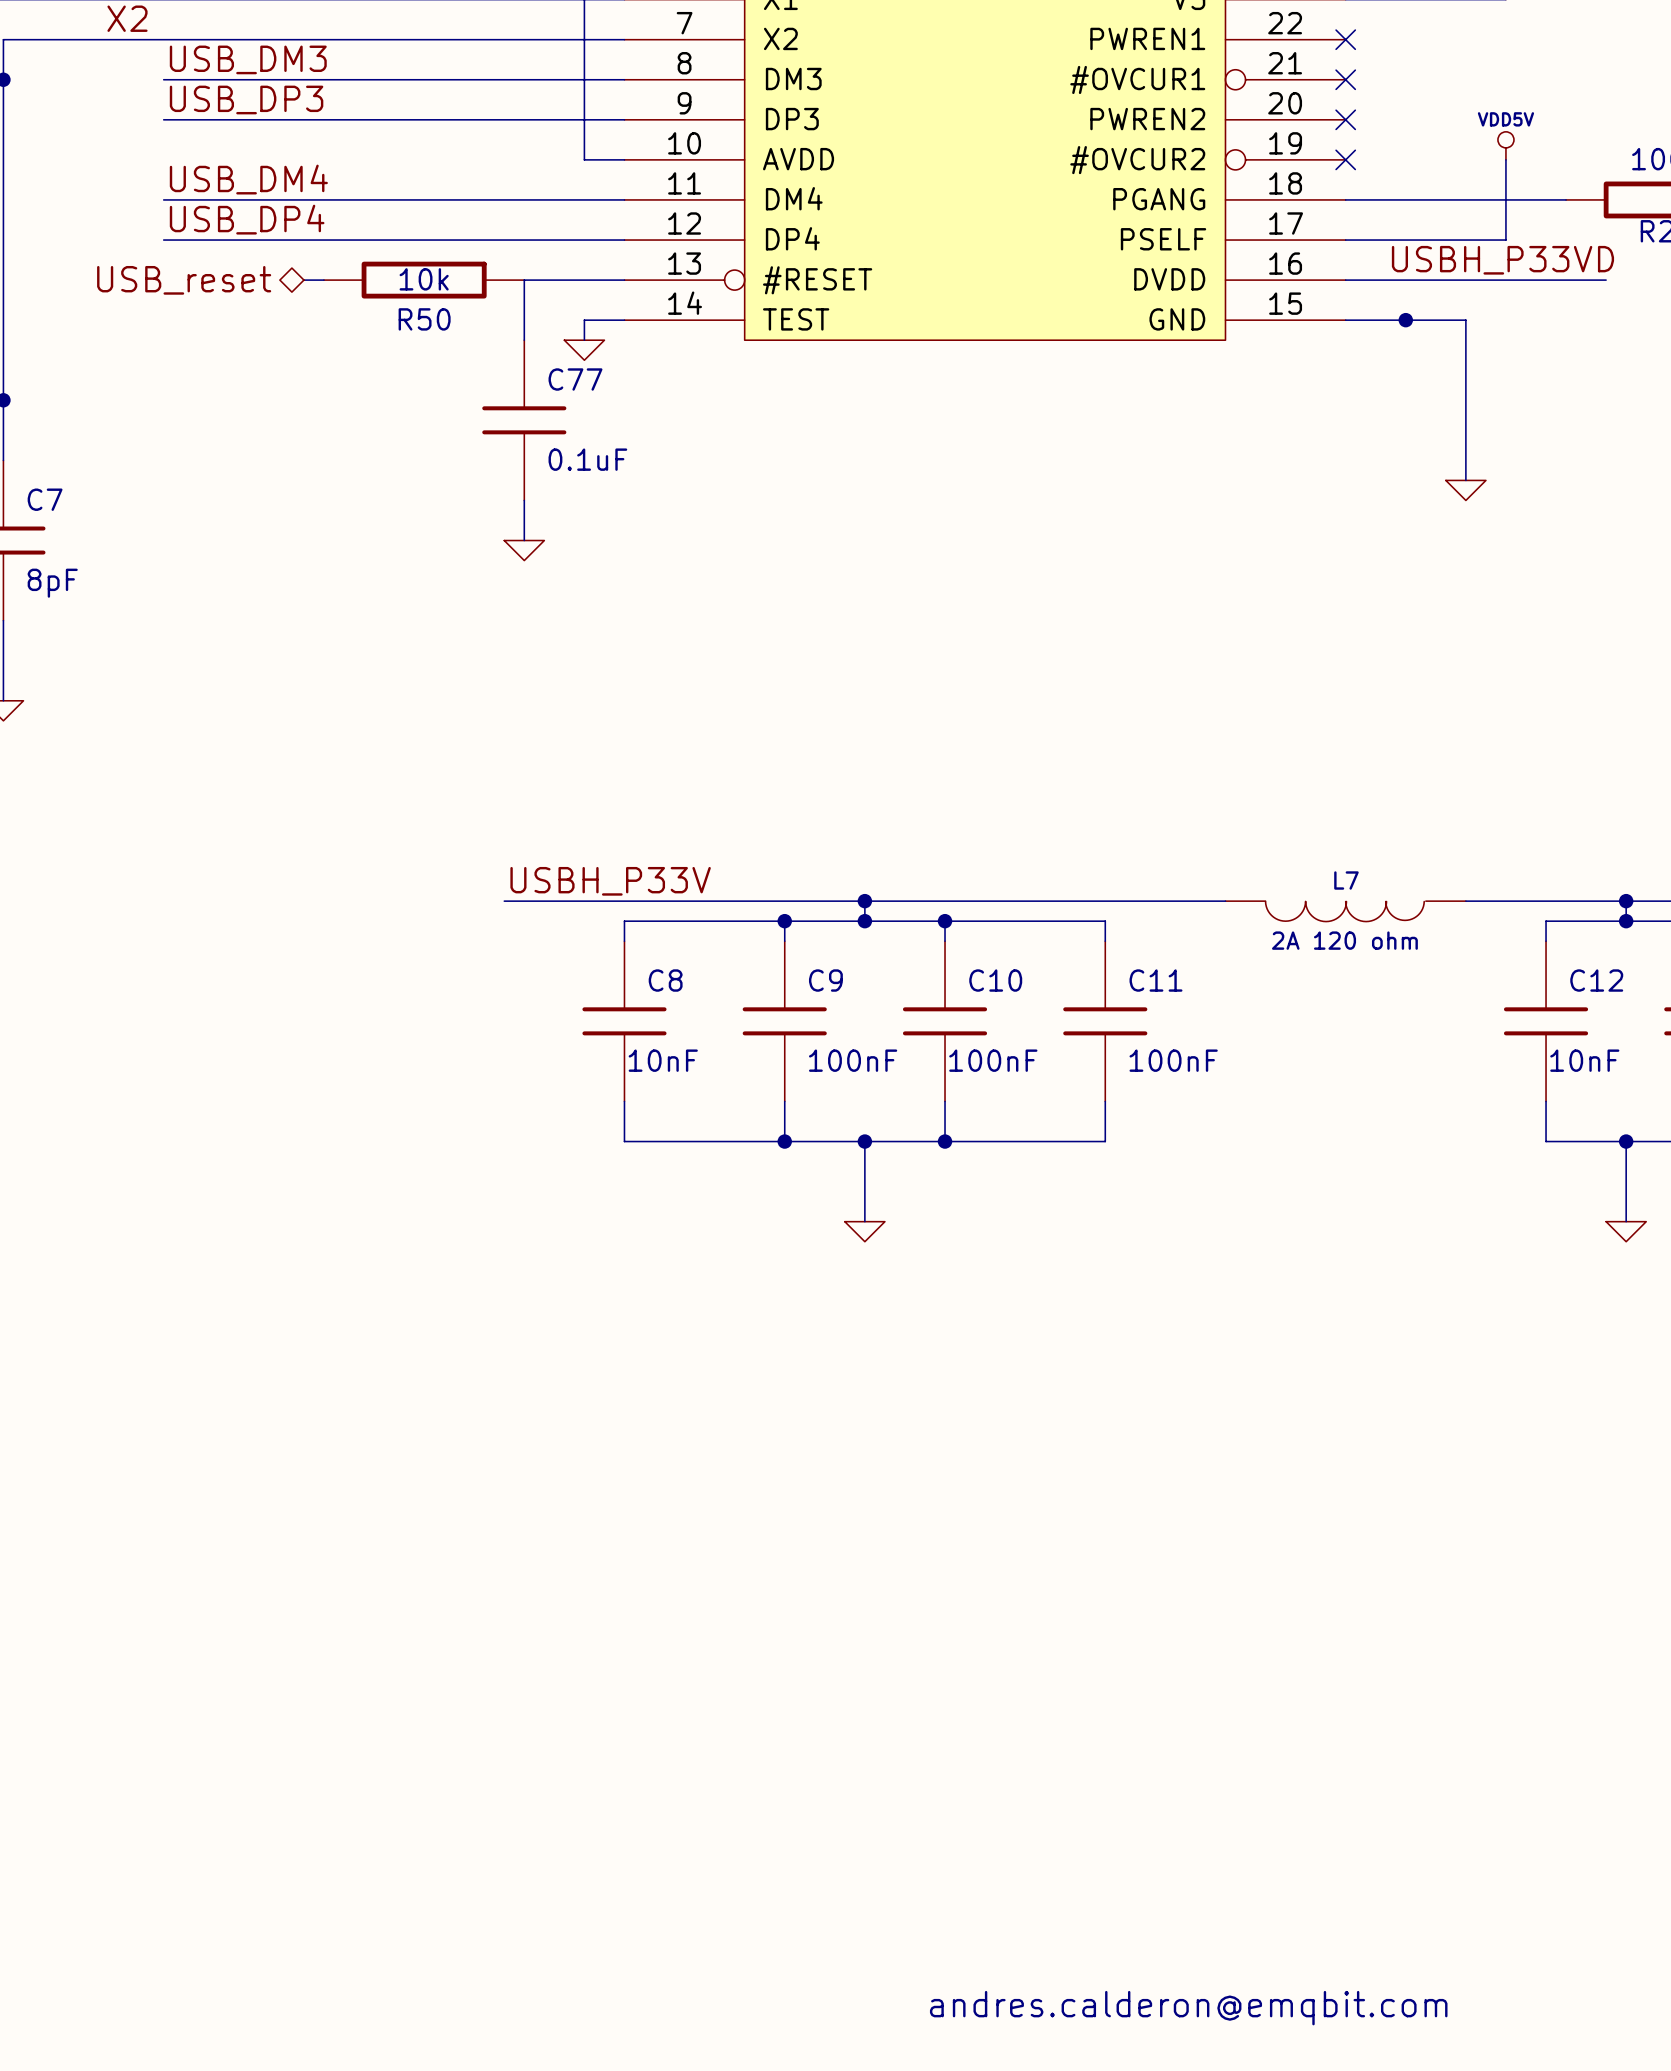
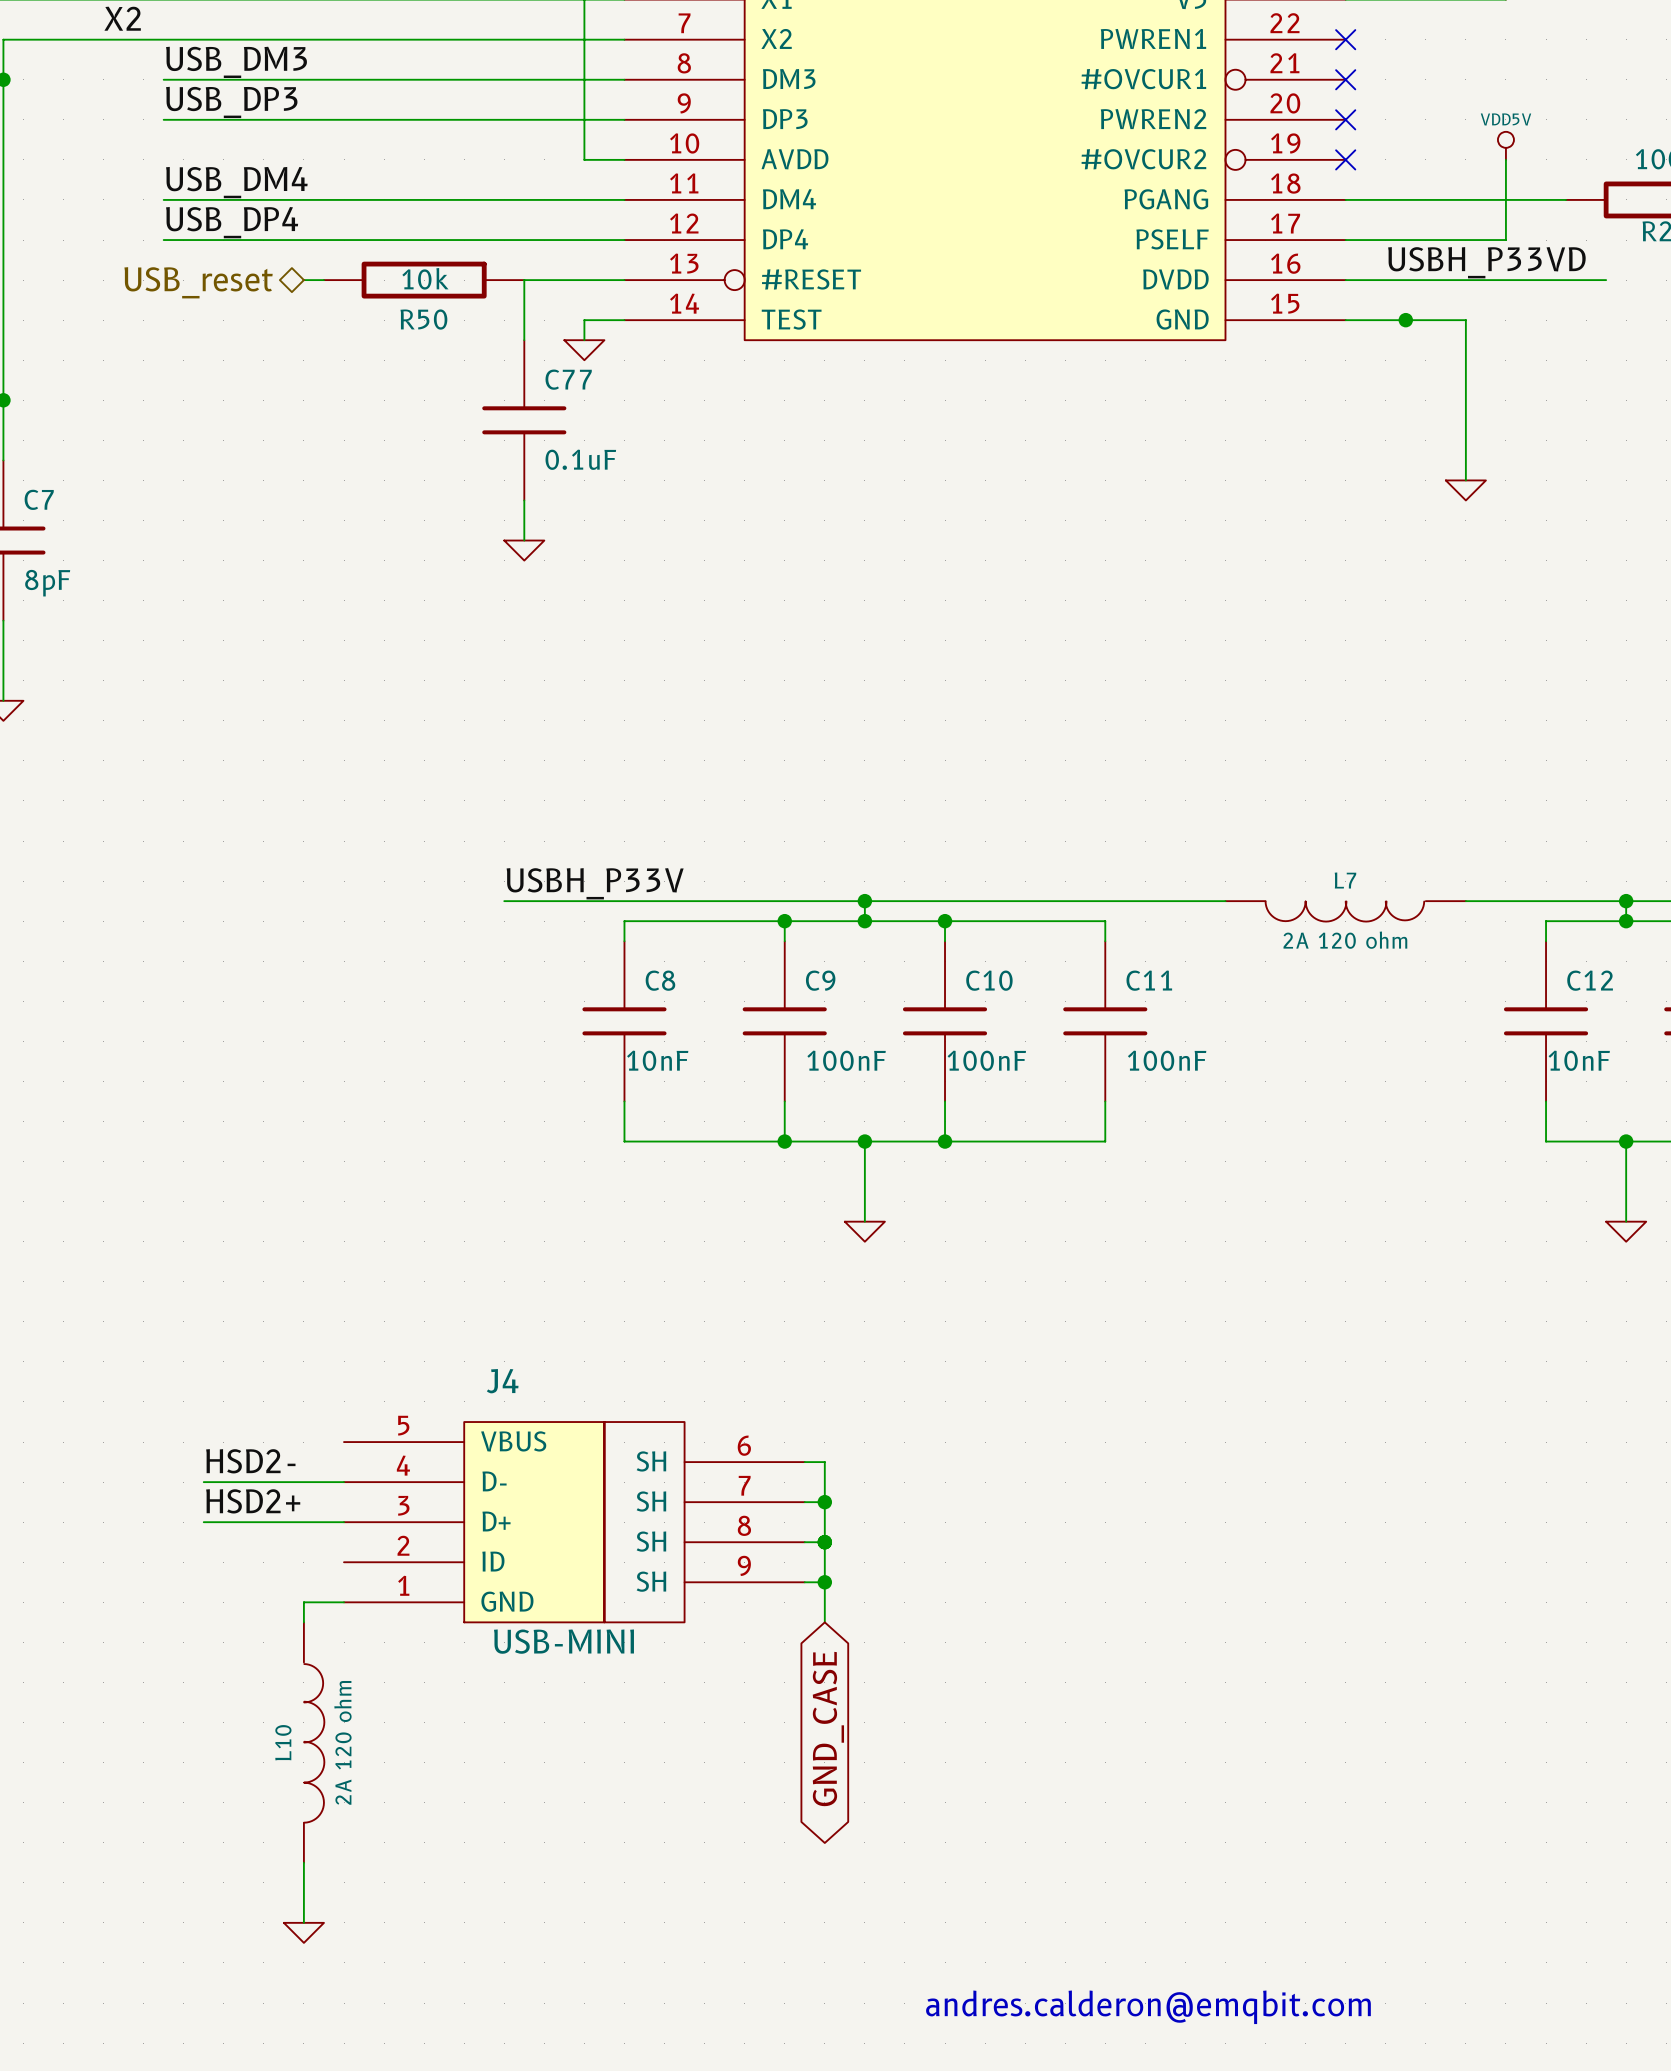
label: none -> HSD2- (250, 1461)
wire: none -> (804, 1462) (824, 1462) (824, 1622)
wire: none -> (203, 1482) (344, 1482)
label: none -> HSD2+ (253, 1501)
wire: none -> (804, 1502) (824, 1502)
junction: none -> (824, 1502)
wire: none -> (203, 1522) (344, 1522)
J4: none -> USB-MINI (574, 1522)
wire: none -> (804, 1542) (824, 1542)
junction: none -> (824, 1542)
wire: none -> (804, 1582) (824, 1582)
junction: none -> (824, 1582)
wire: none -> (344, 1602) (303, 1602) (303, 1622)
global label: none -> GND_CASE (828, 1729)
L10: none -> 2A 120 ohm (314, 1742)
wire: none -> (303, 1862) (303, 1922)
power symbol: none -> (303, 1932)

